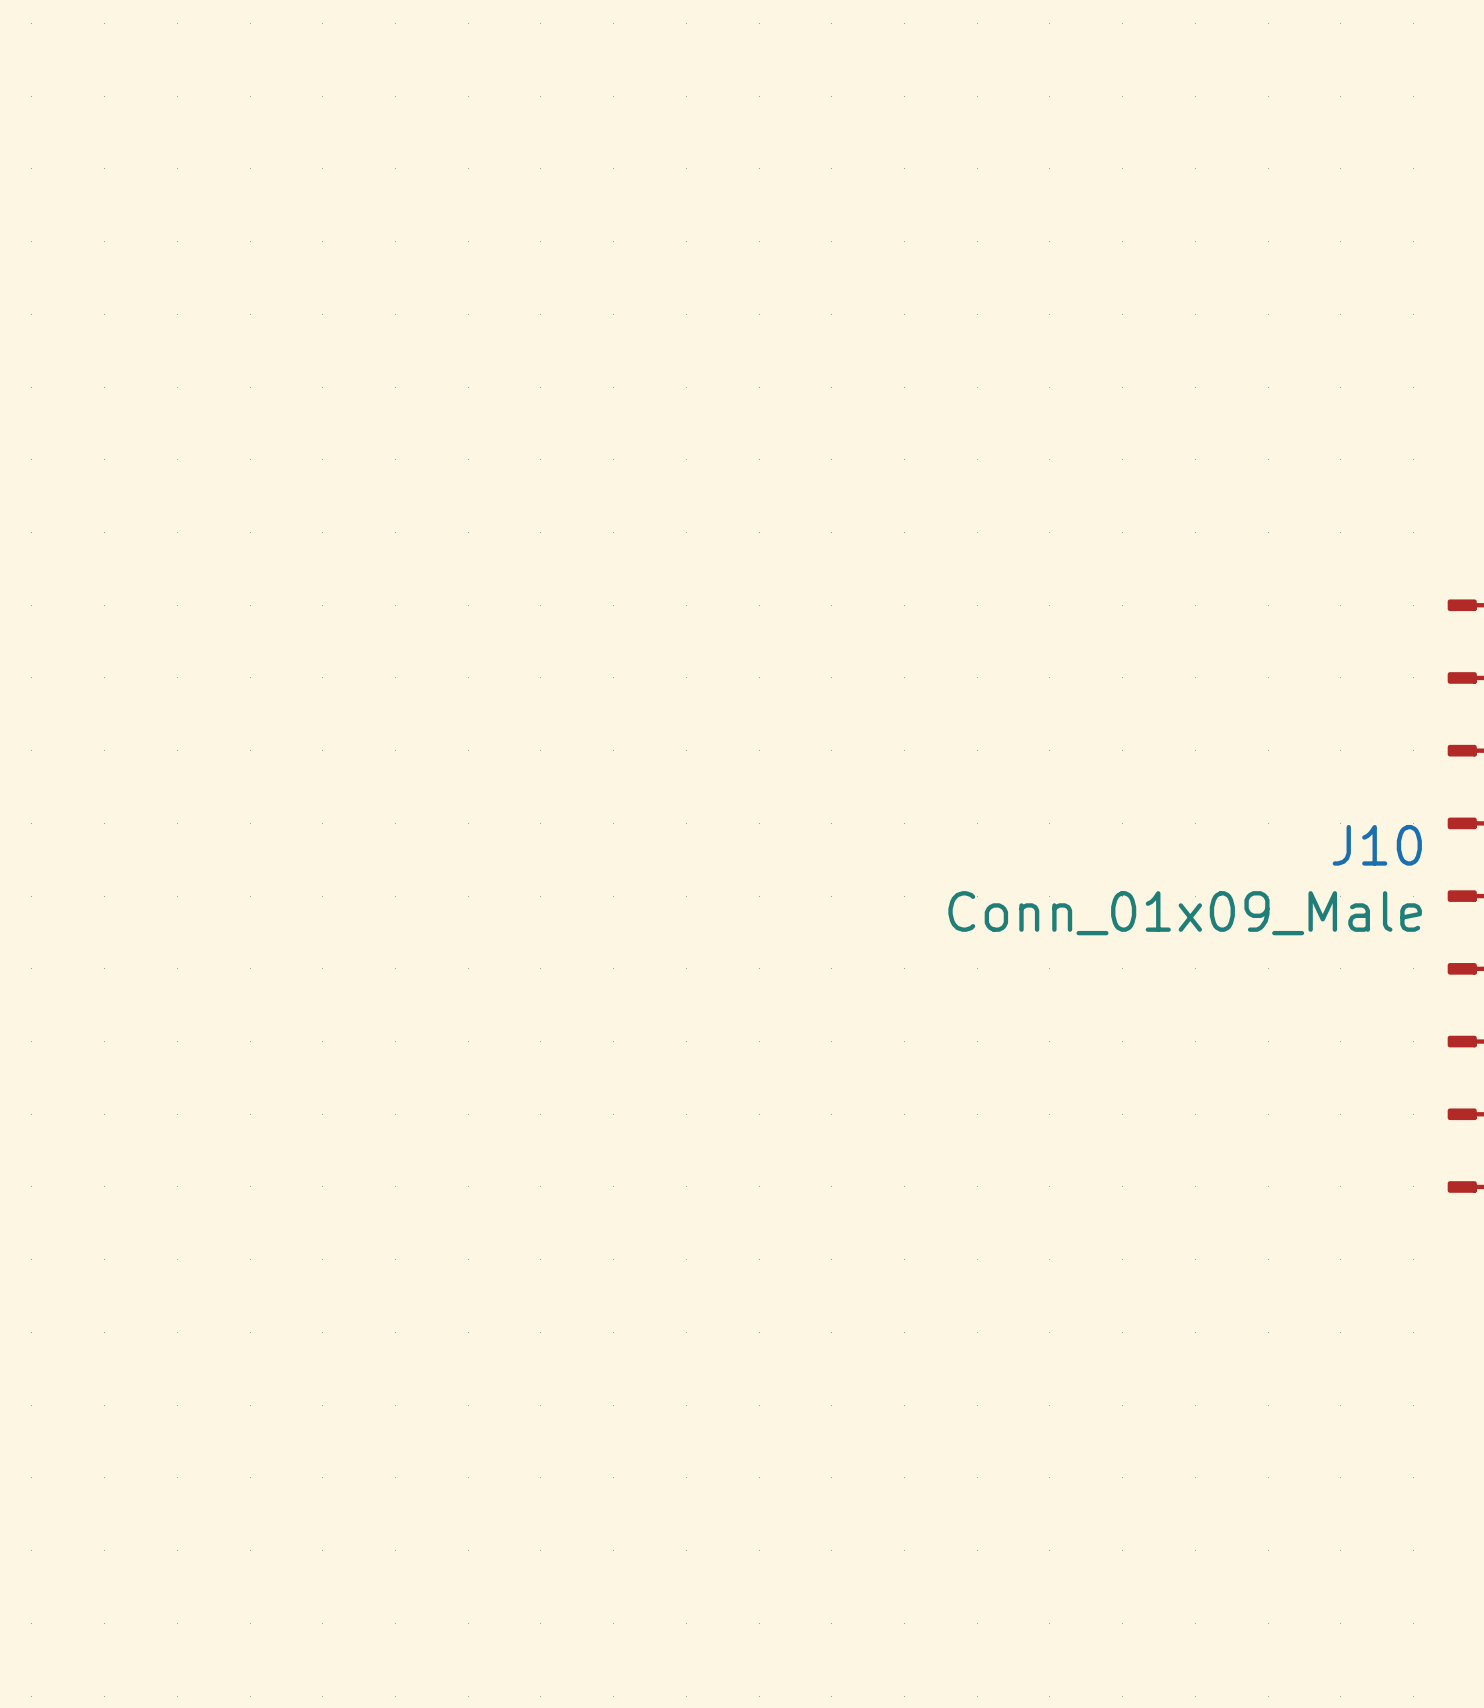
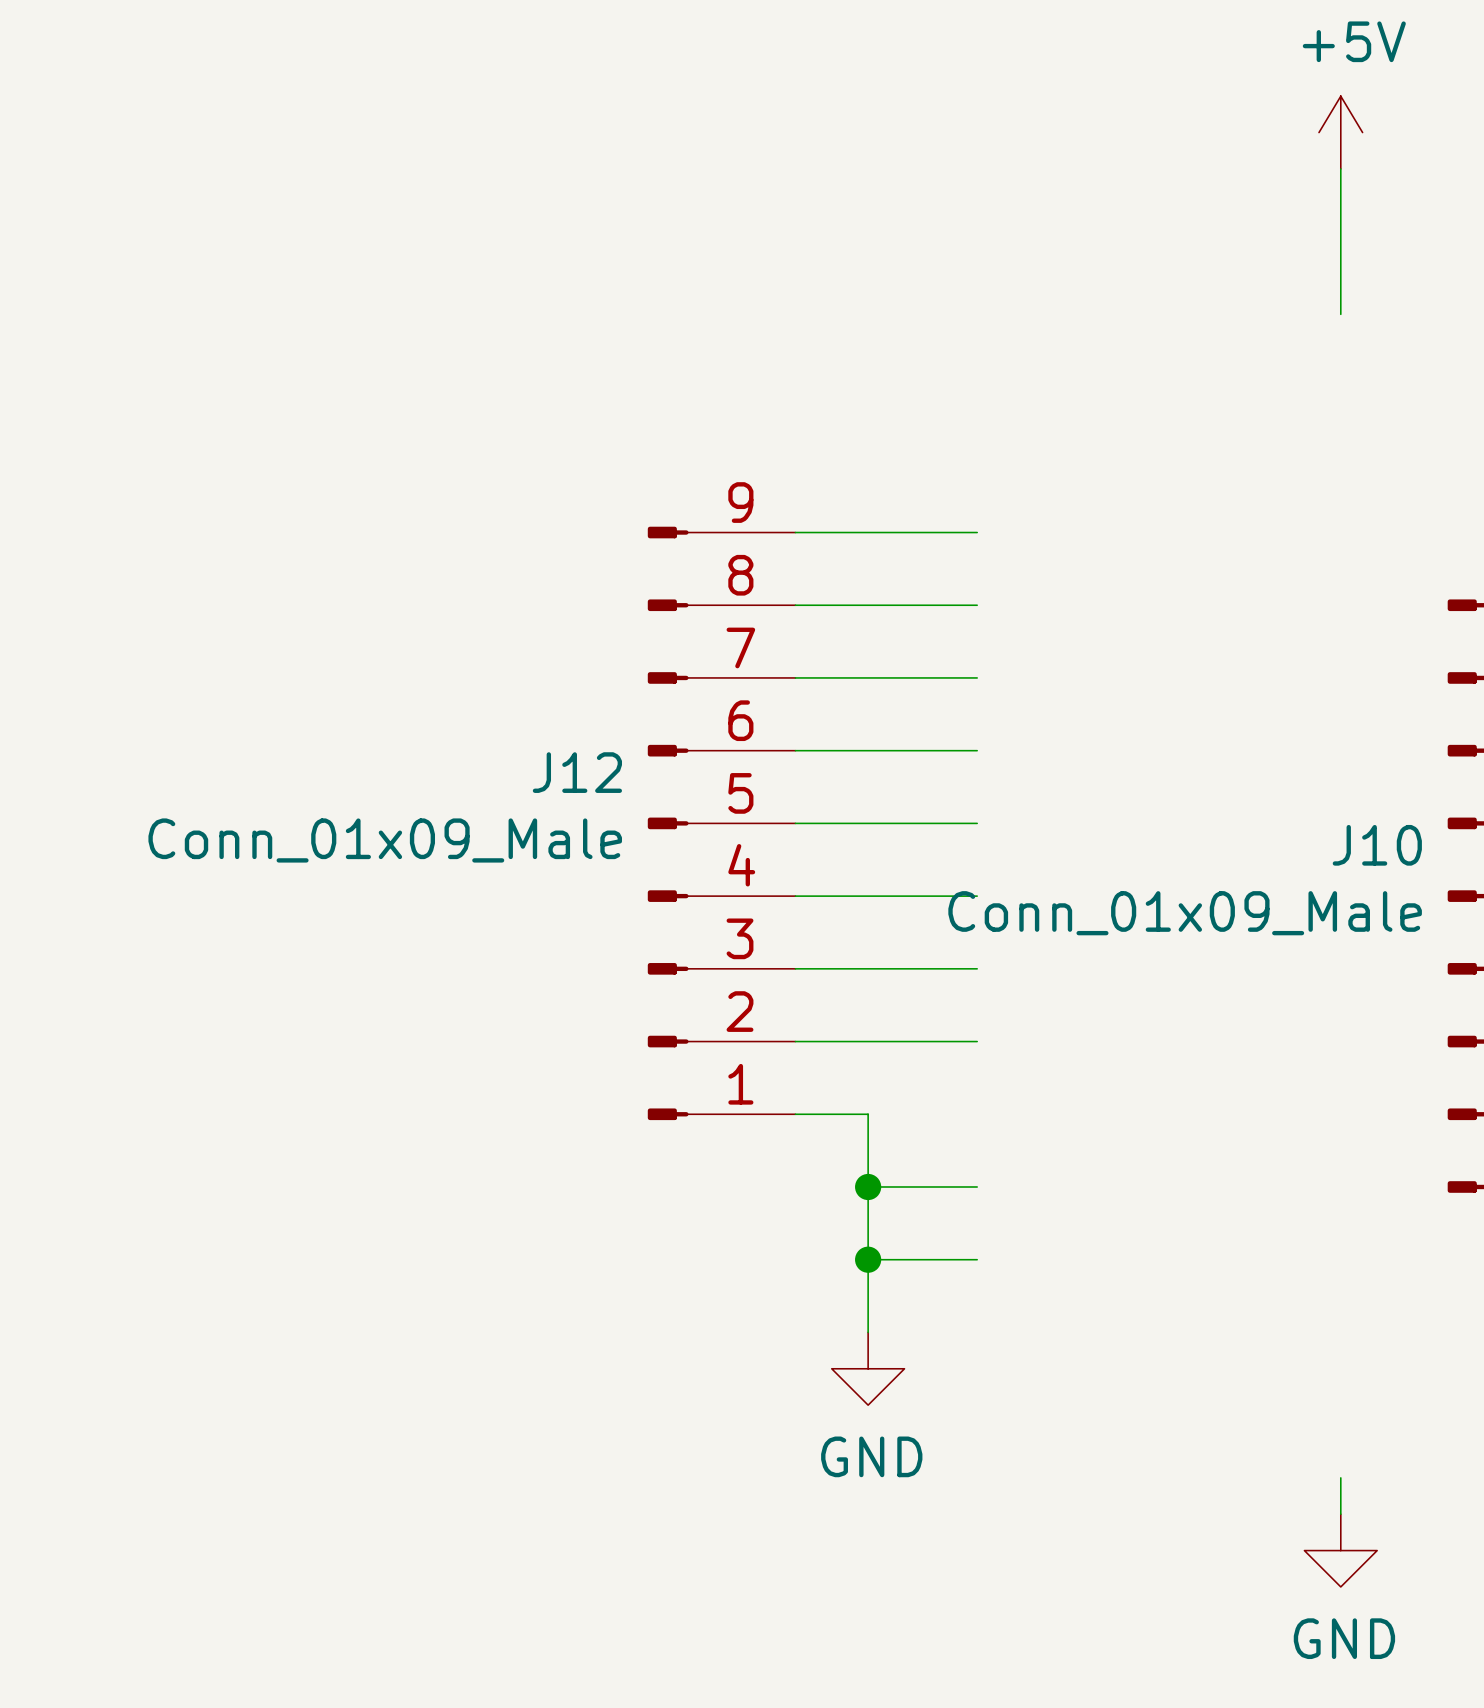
power symbol: none -> +5V (1340, 132)
wire: none -> (1340, 168) (1340, 314)
wire: none -> (795, 532) (977, 532)
wire: none -> (795, 605) (977, 605)
wire: none -> (795, 677) (977, 677)
wire: none -> (795, 750) (977, 750)
J12: none -> Conn_01x09_Male (721, 823)
wire: none -> (795, 823) (977, 823)
wire: none -> (795, 896) (977, 896)
wire: none -> (795, 968) (977, 968)
wire: none -> (795, 1041) (977, 1041)
wire: none -> (795, 1114) (868, 1114) (868, 1332)
wire: none -> (868, 1186) (977, 1186)
junction: none -> (868, 1186)
wire: none -> (868, 1259) (977, 1259)
junction: none -> (868, 1259)
power symbol: none -> GND (868, 1368)
wire: none -> (1340, 1477) (1340, 1514)
power symbol: none -> GND (1340, 1550)

